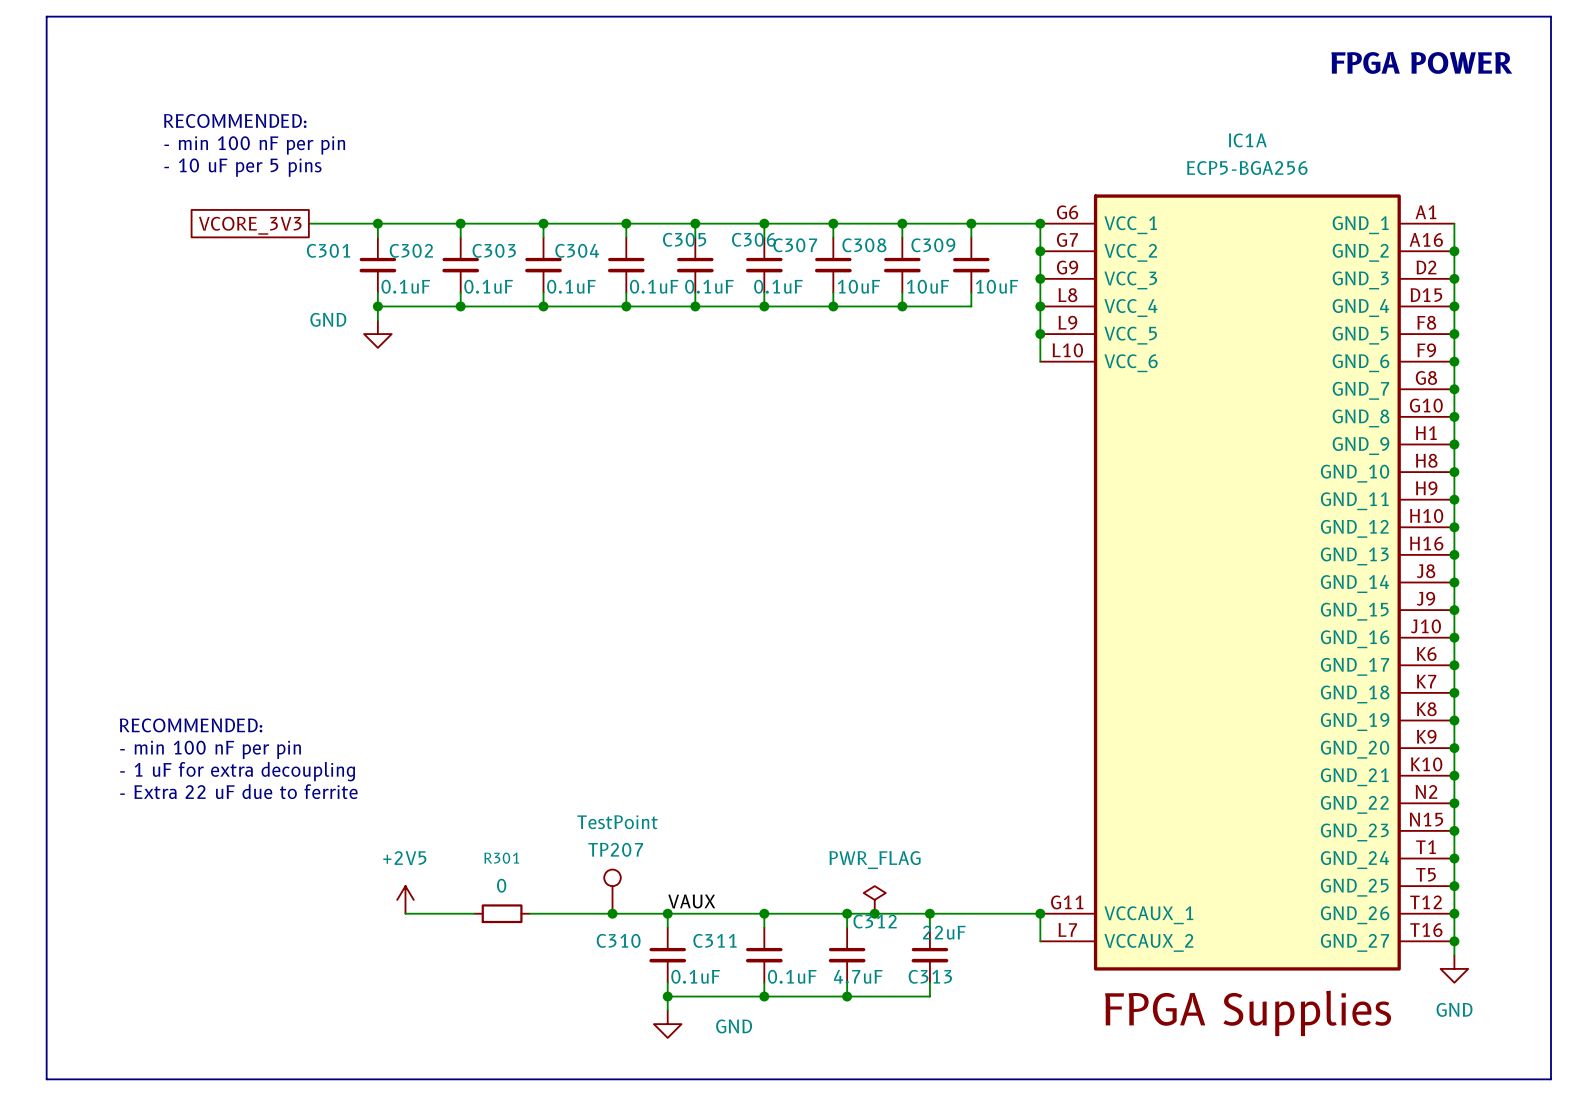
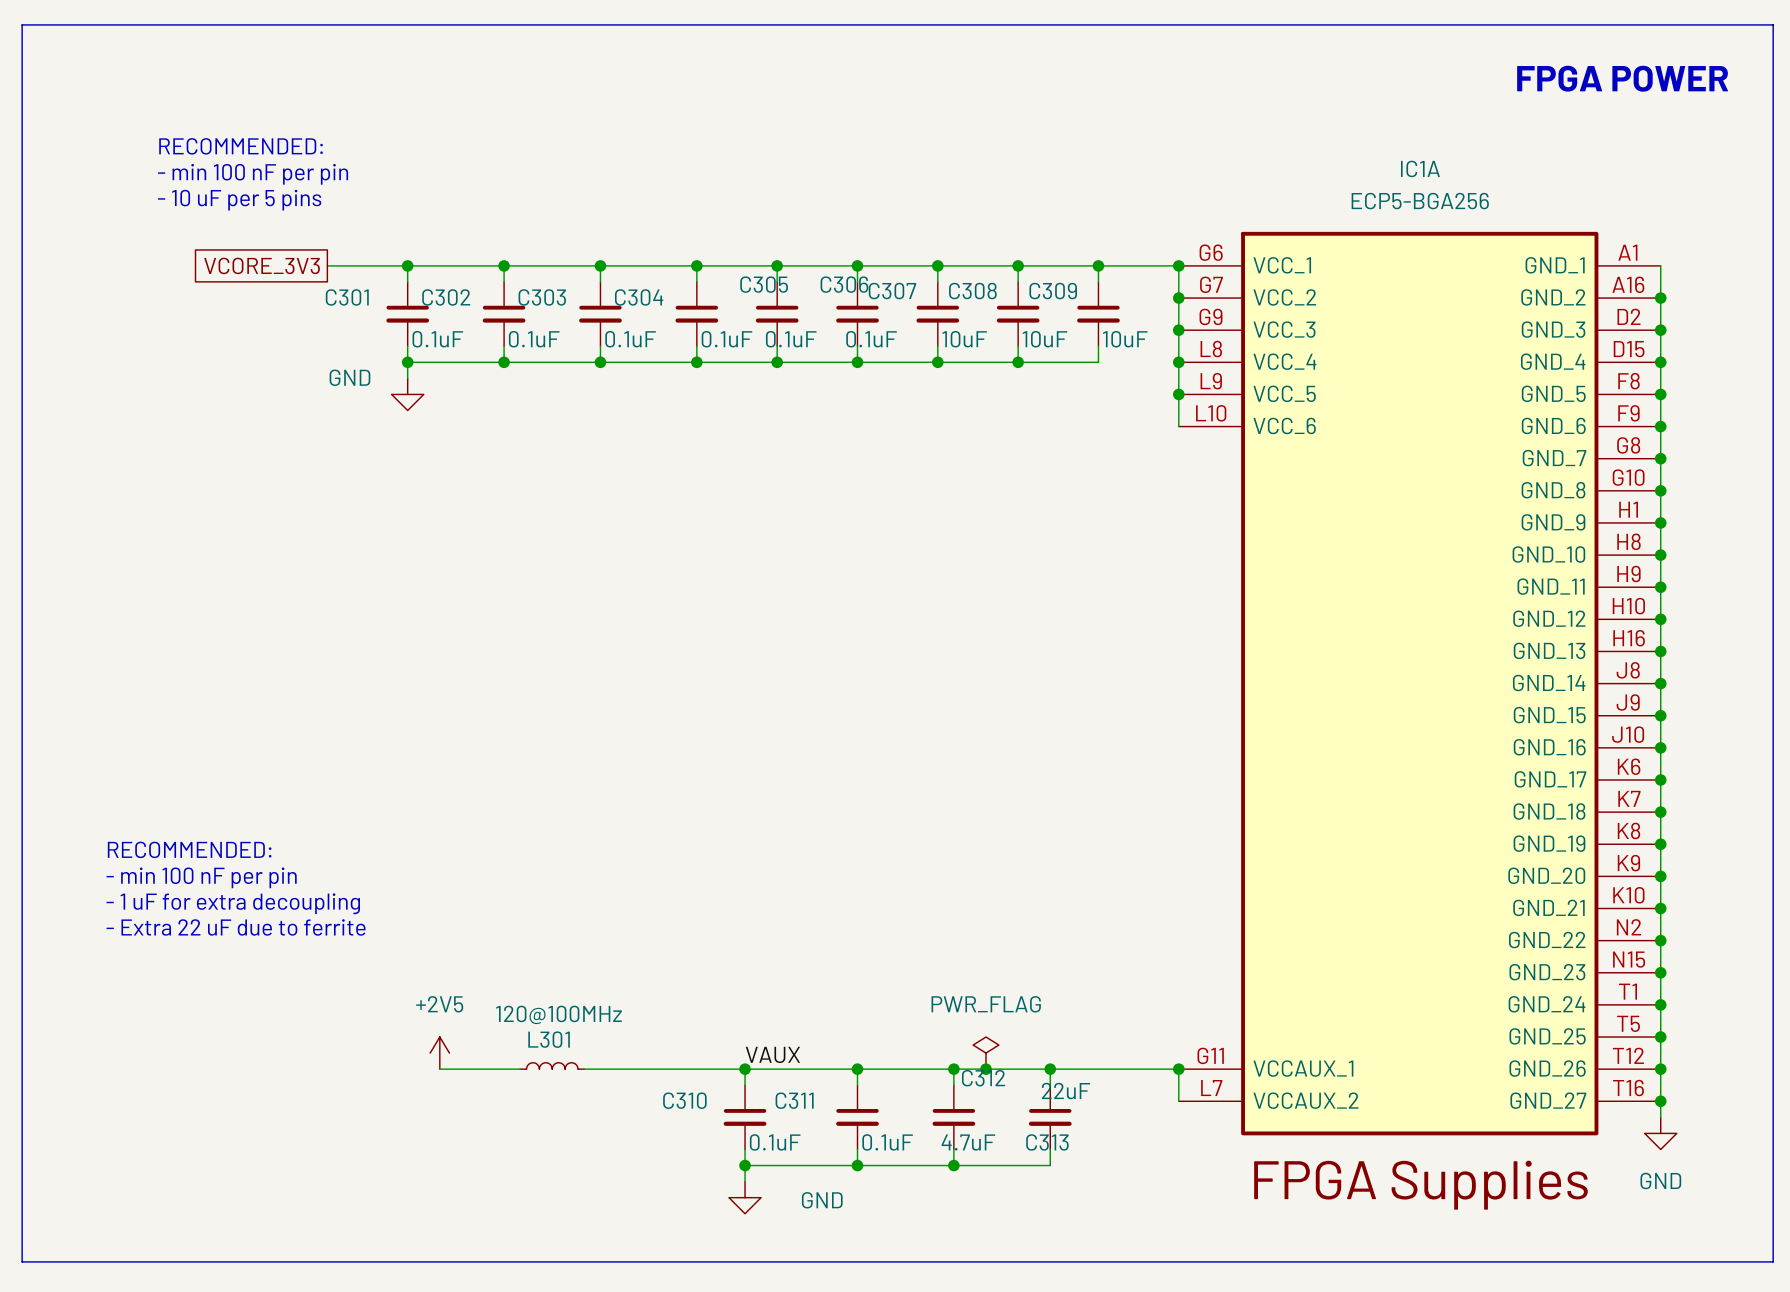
TP207: TestPoint (612, 891) -> none
L301: none -> 120@100MHz (552, 1065)
R301: 0 (502, 913) -> none
junction: (612, 913) -> none

